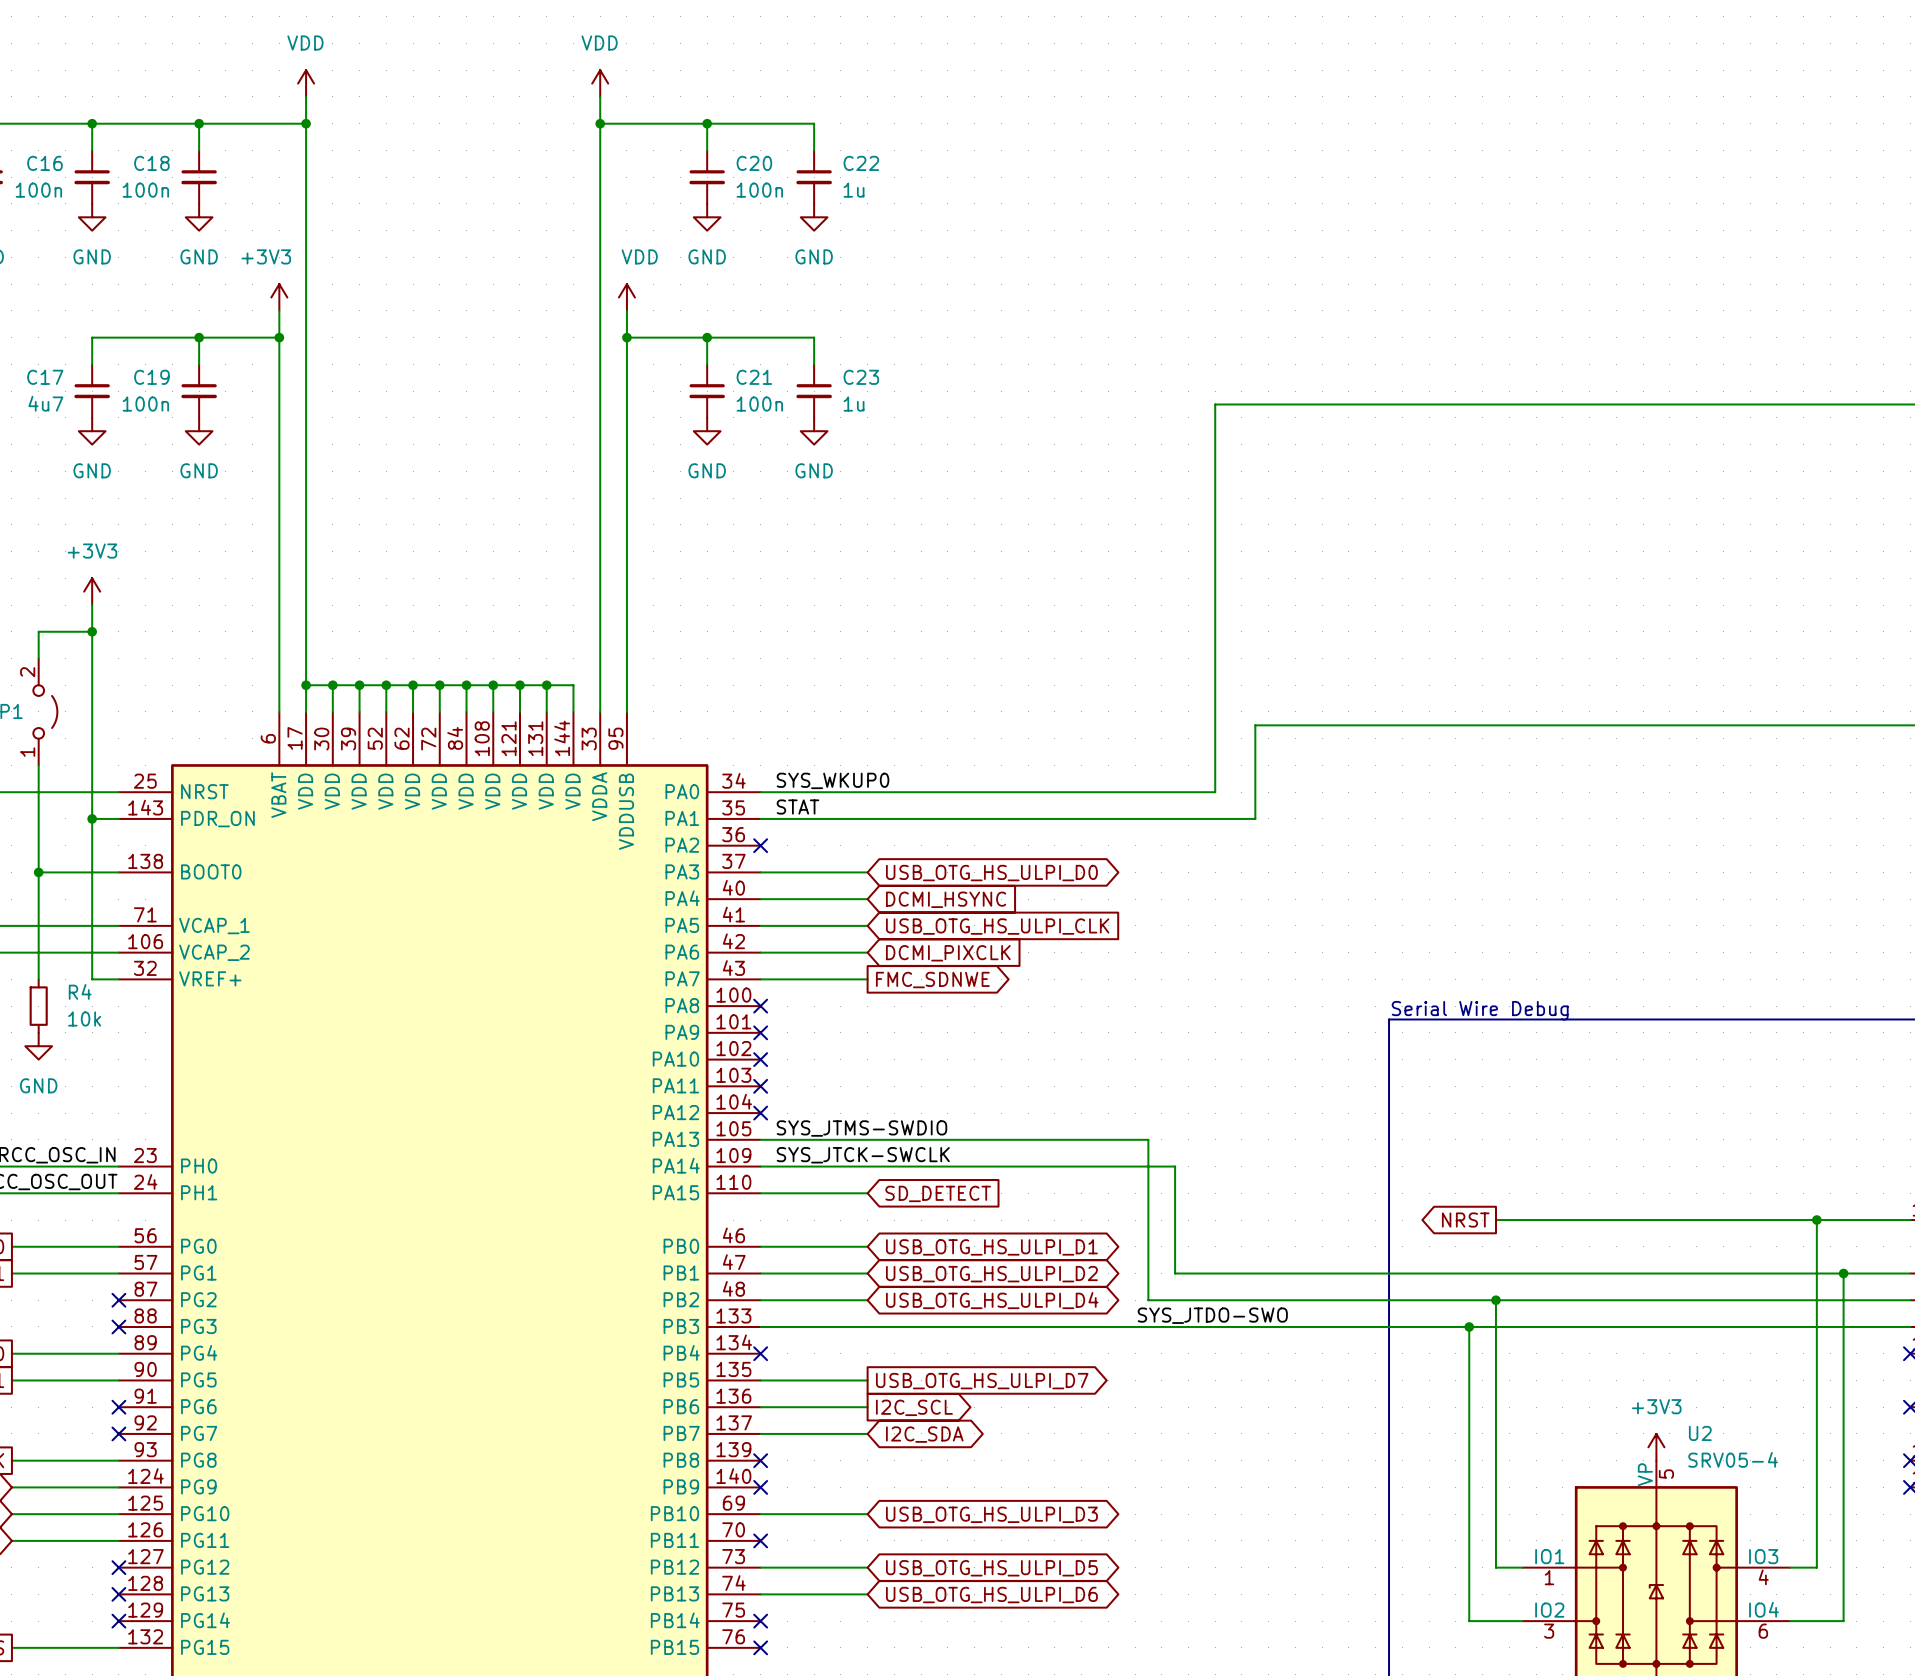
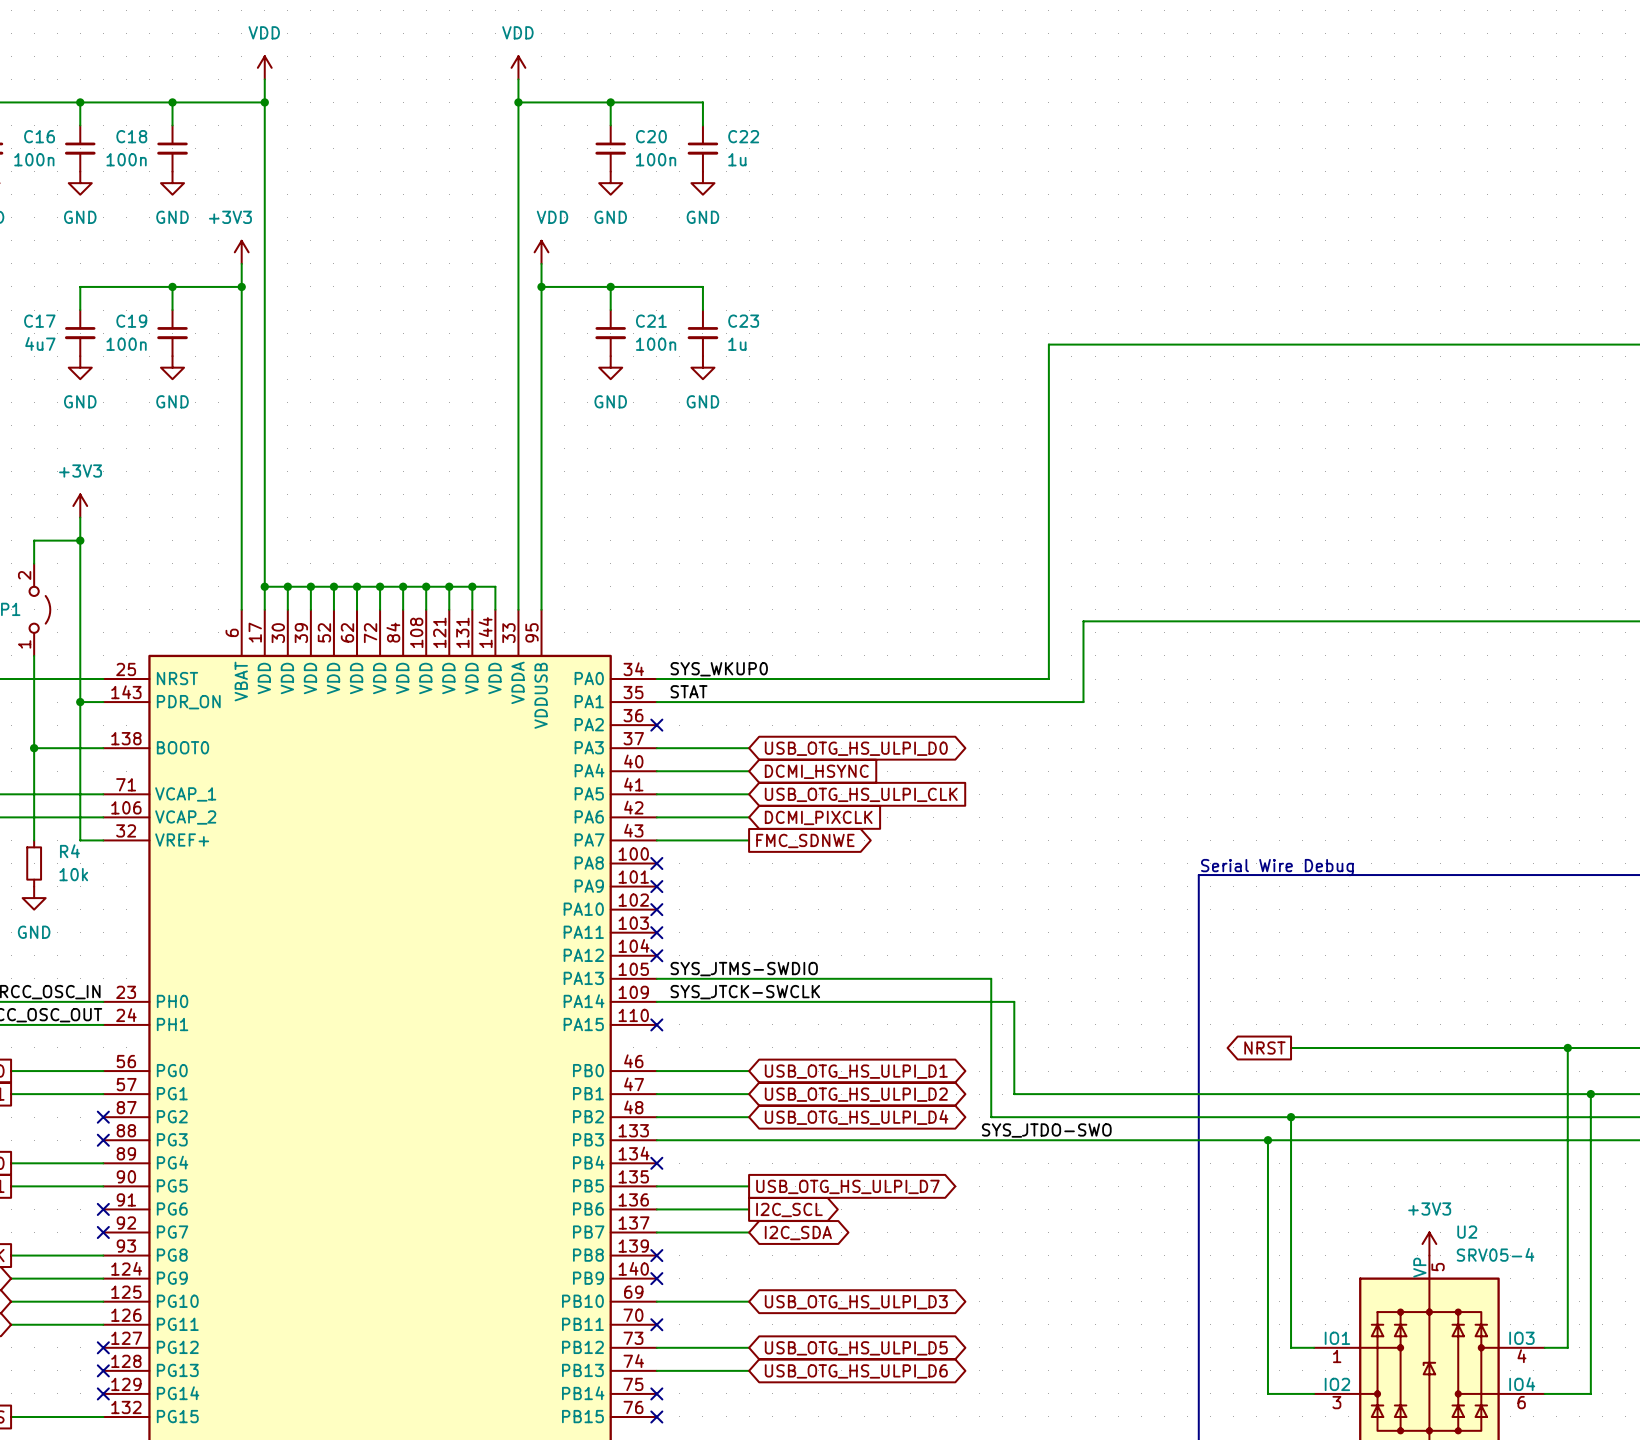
wire: (760, 1193) (867, 1193) -> none
no-connect mark: none -> (656, 1024)
global label: SD_DETECT (938, 1193) -> none

